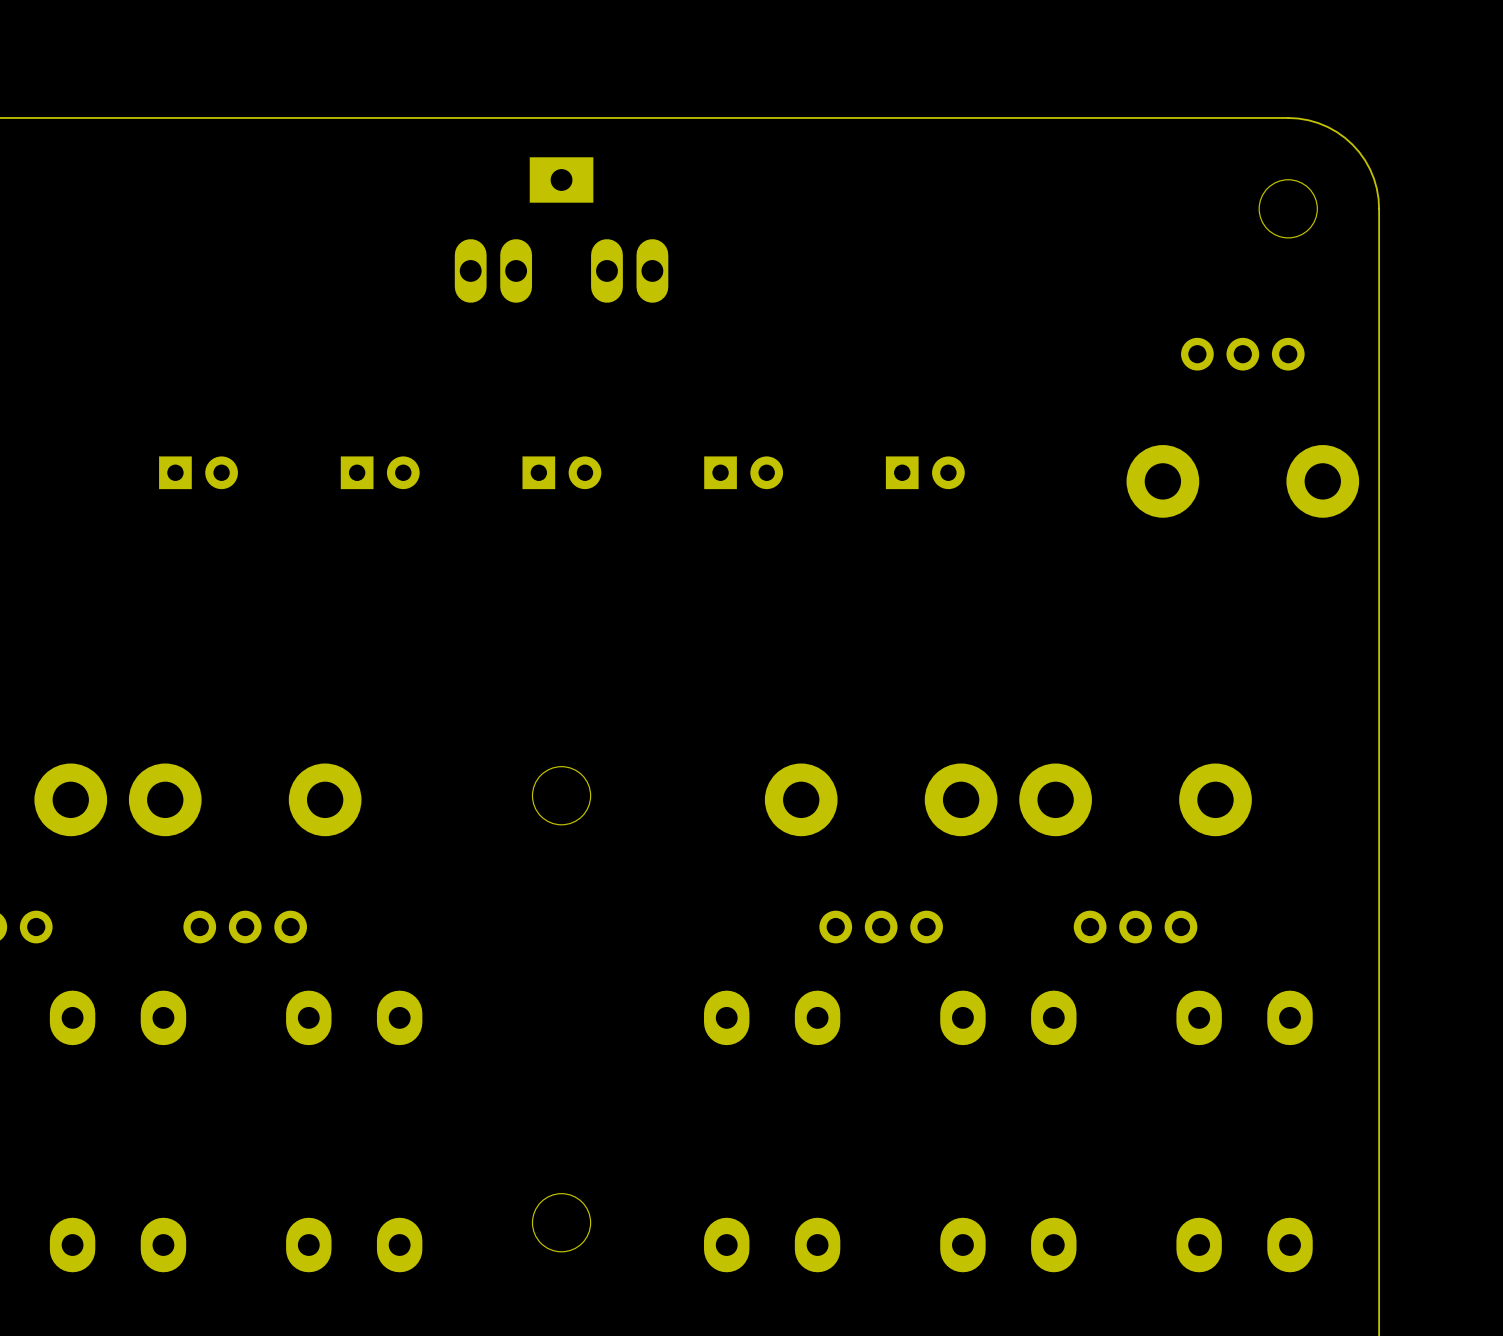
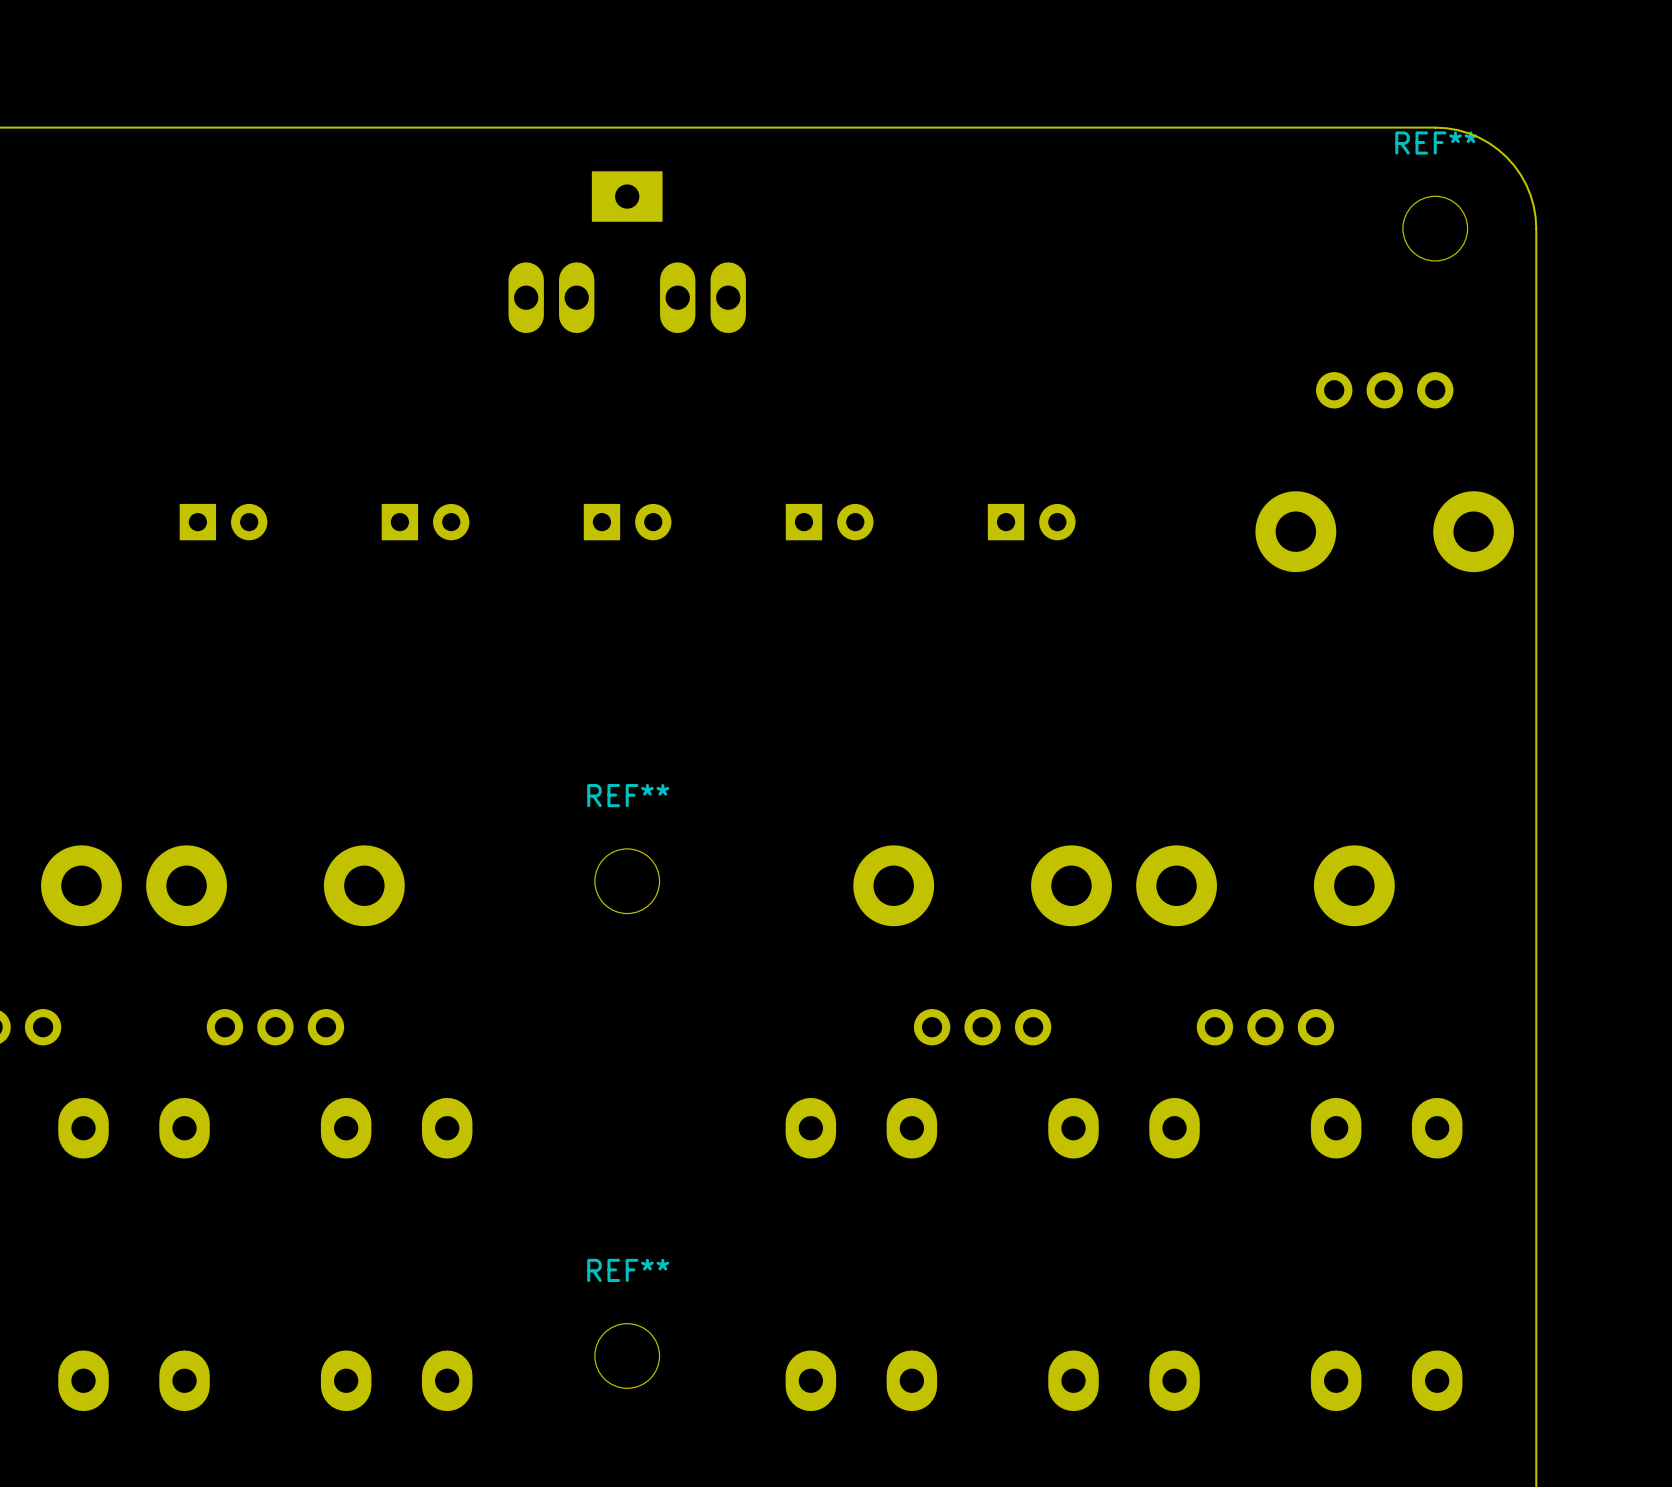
REF** name: none -> REF** (1436, 143)
REF** name: none -> REF** (628, 795)
REF** name: none -> REF** (628, 1270)

